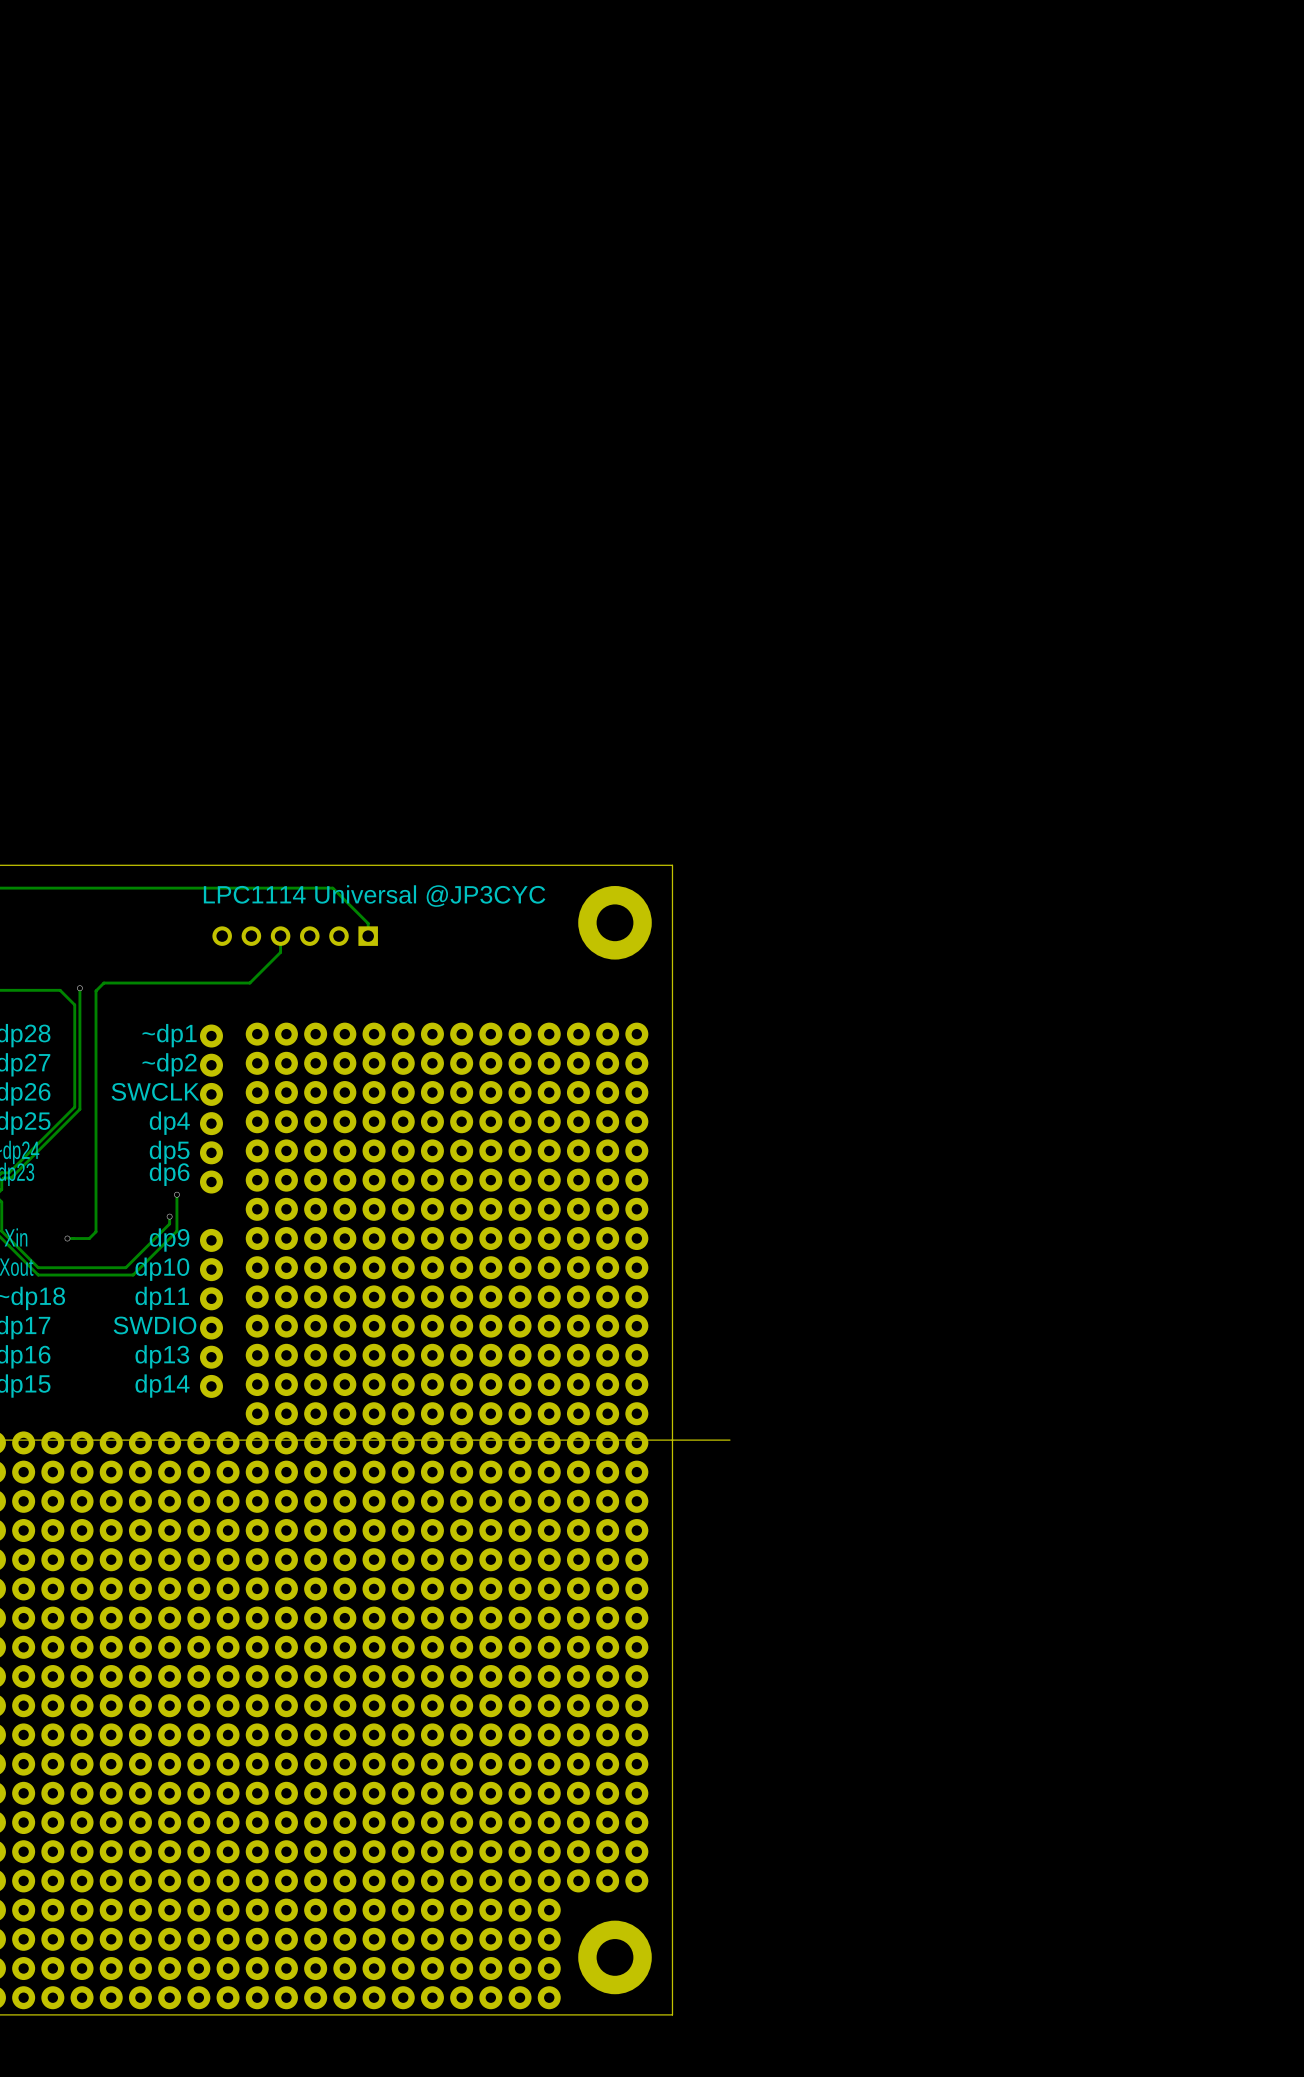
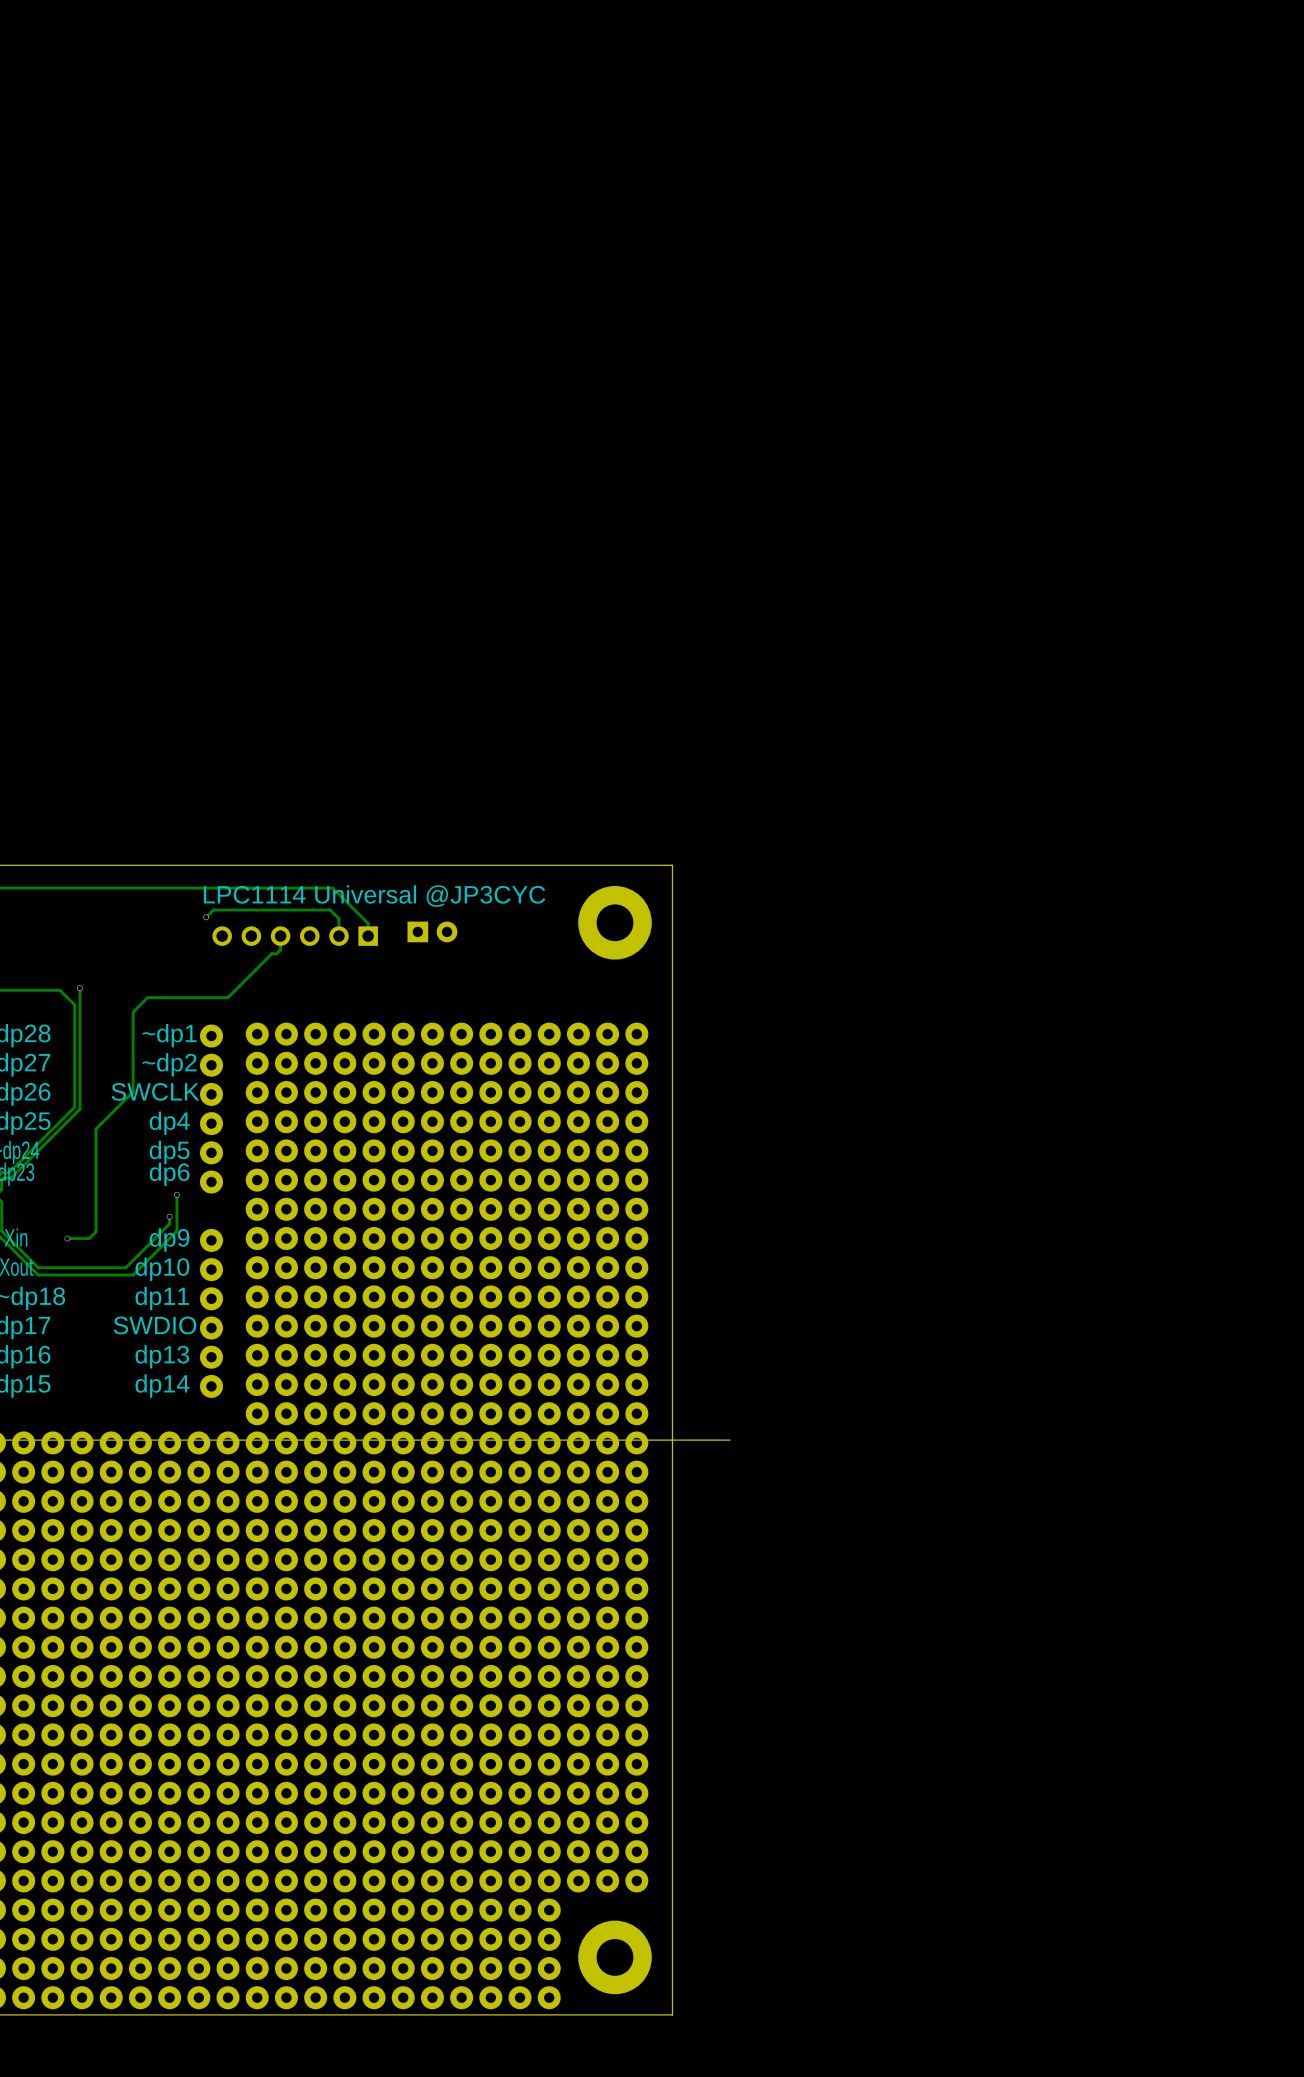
track: none -> (206, 917) (213, 910) (330, 910) (338, 918) (338, 936)
via: none -> (206, 917)
part: none -> (432, 931)
track: (280, 949) (280, 952) (249, 983) (103, 983) (96, 990) (96, 1129) -> (280, 949) (276, 953) (271, 953) (228, 997) (147, 997) (133, 1012) (133, 1091) (96, 1129)

